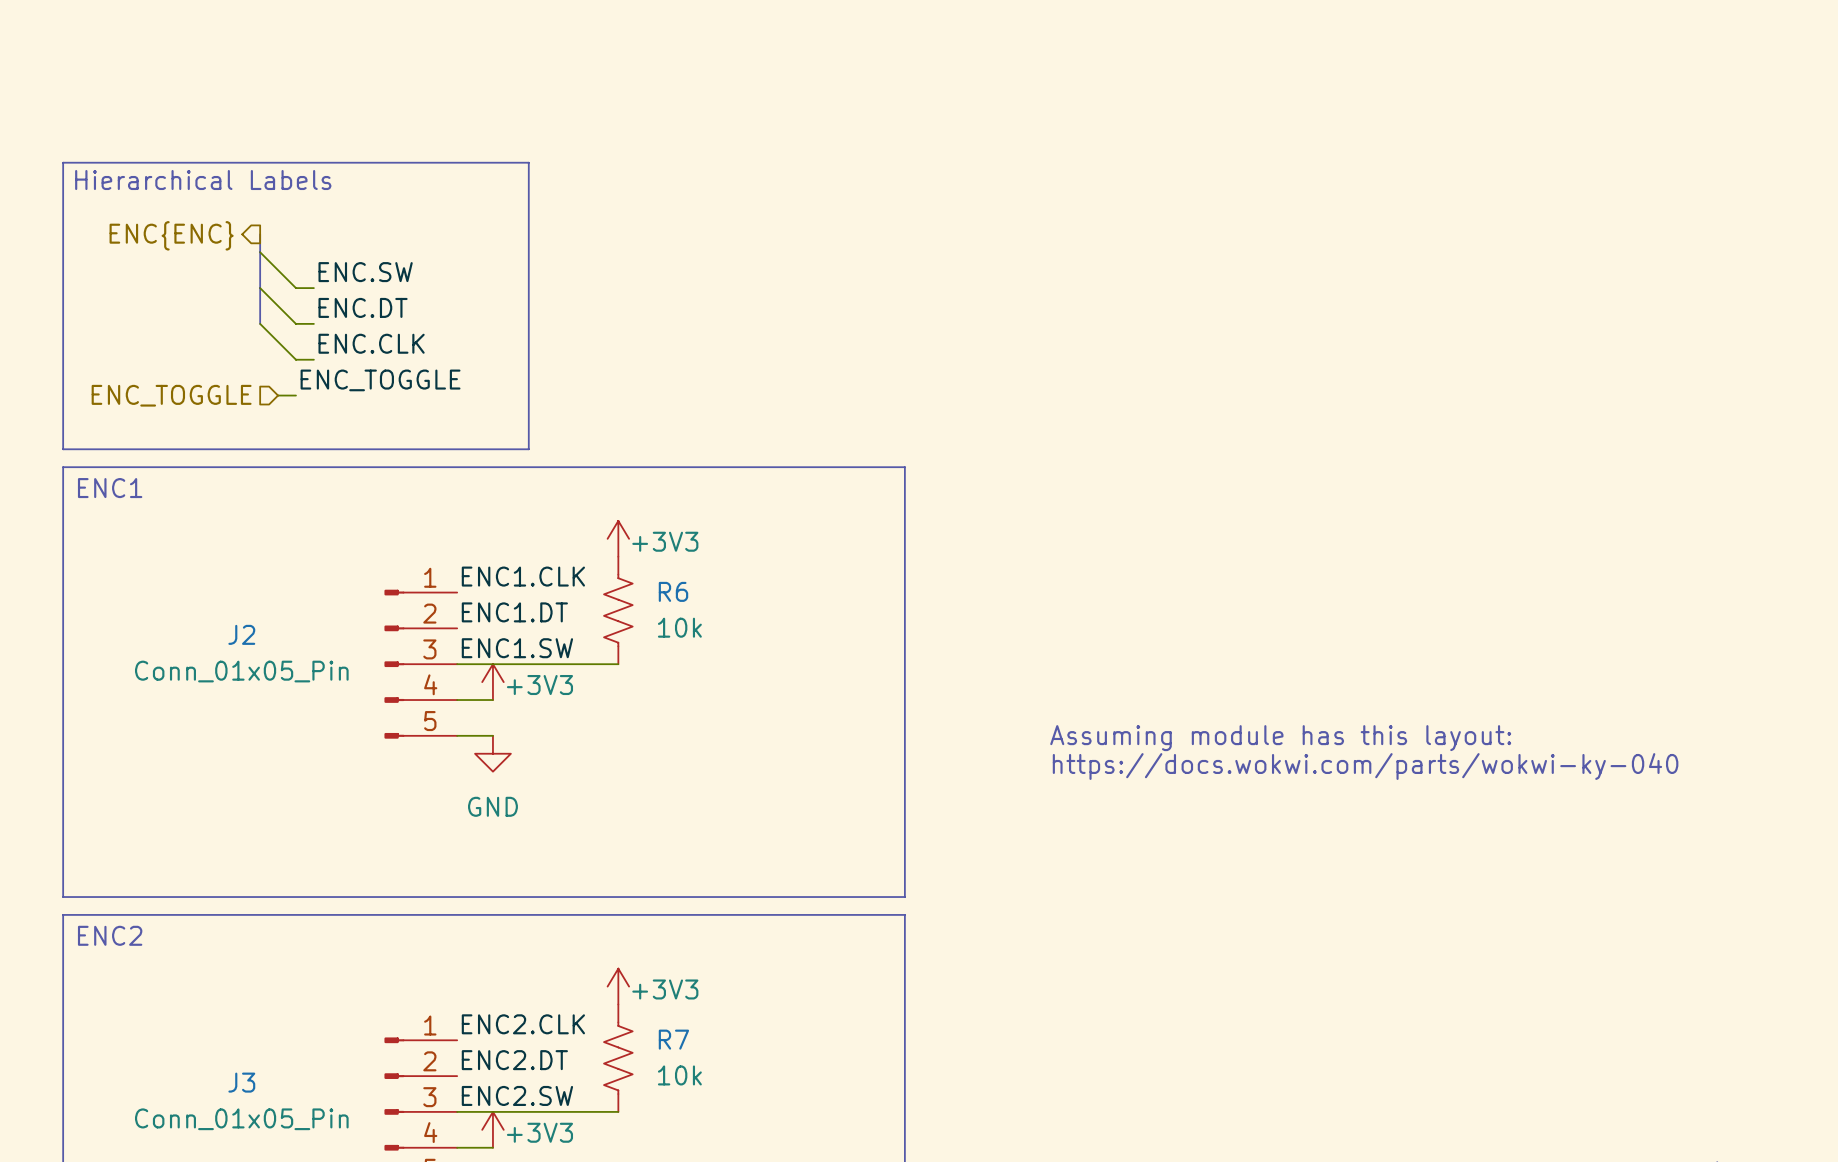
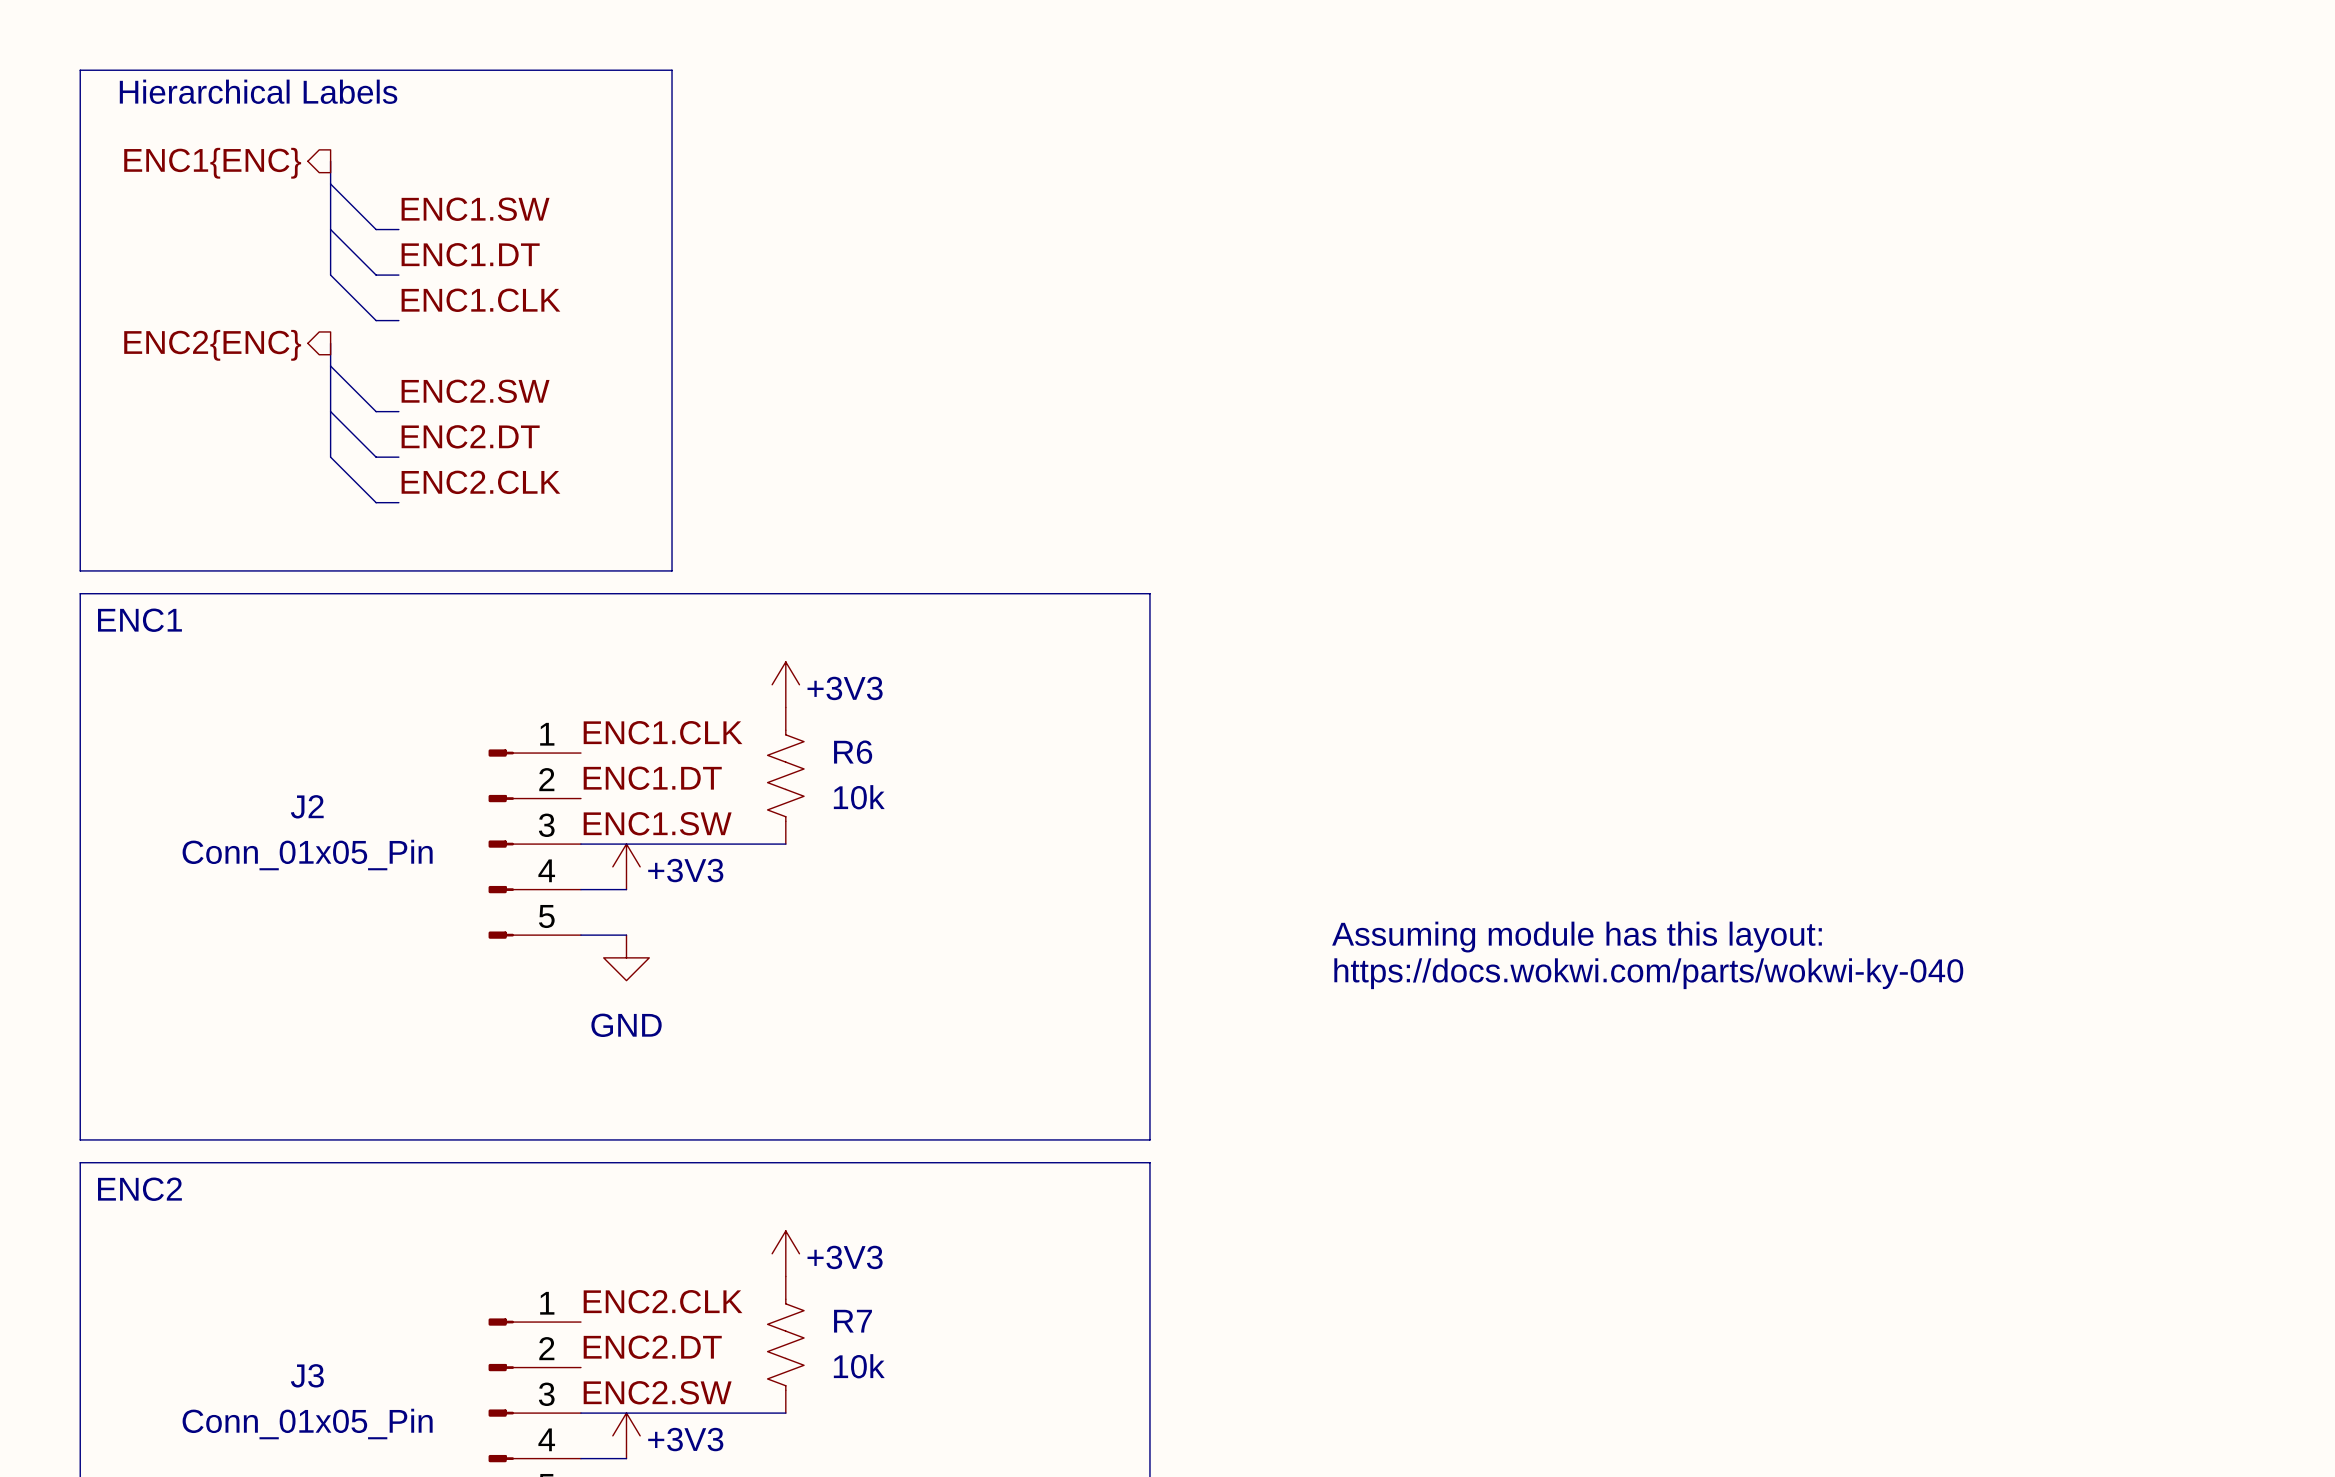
bus: none -> (330, 161) (330, 275)
hierarchical label: none -> ENC1{ENC} (212, 163)
wire: none -> (330, 184) (376, 229) (398, 229)
line: (63, 162) (528, 162) -> (80, 206) (80, 70) (672, 70) (672, 206)
label: none -> ENC1.SW (475, 209)
text position: Hierarchical Labels (203, 180) -> Hierarchical Labels (258, 91)
wire: none -> (330, 229) (376, 275) (398, 275)
label: none -> ENC1.DT (470, 254)
bus: (260, 234) (260, 270) -> (330, 411) (330, 457)
hierarchical label: ENC{ENC} (171, 235) -> ENC2{ENC} (212, 345)
label: none -> ENC1.CLK (480, 300)
wire: (260, 252) (295, 288) (313, 288) -> (330, 275) (376, 320) (398, 320)
label: ENC.SW (365, 272) -> none
label: ENC.DT (363, 307) -> ENC2.SW (475, 391)
label: ENC.CLK (371, 343) -> ENC2.DT (470, 436)
wire: none -> (330, 457) (376, 502) (398, 502)
label: none -> ENC2.CLK (480, 482)
label: ENC_TOGGLE (380, 380) -> none
hierarchical label: ENC_TOGGLE (171, 395) -> none
wire: (278, 395) (295, 395) -> none

